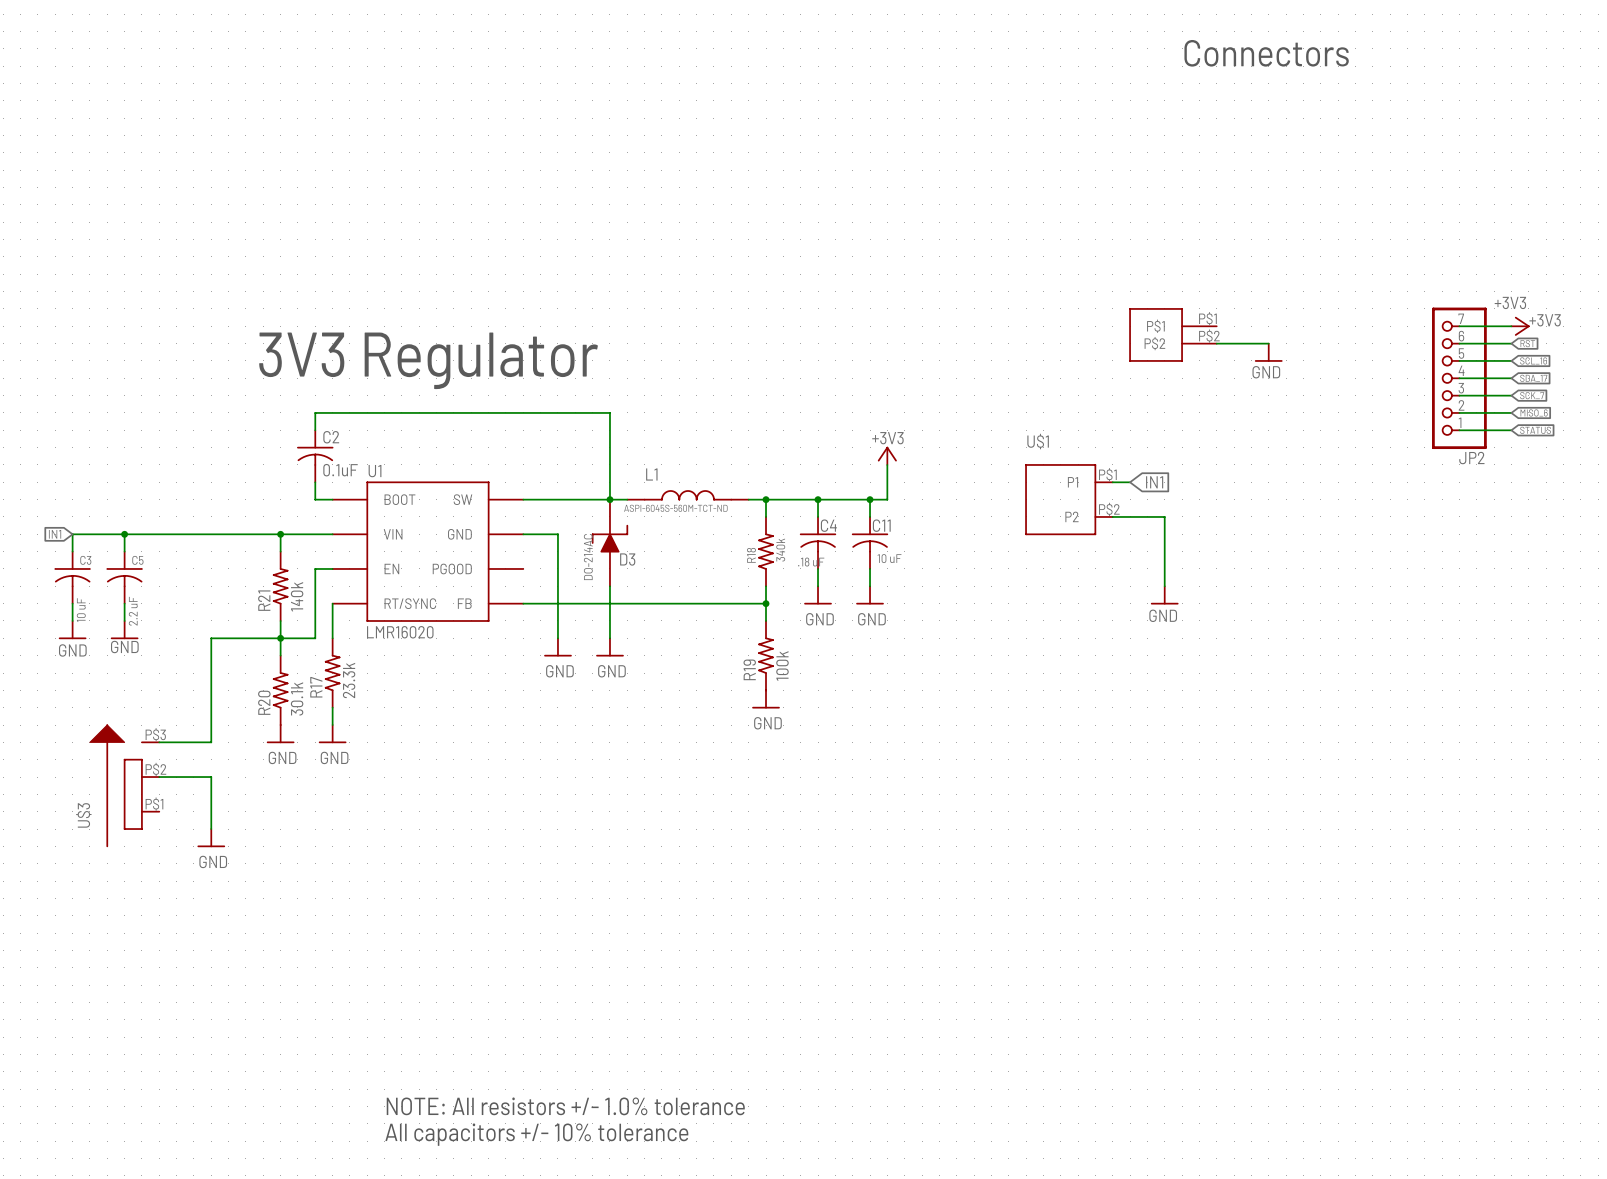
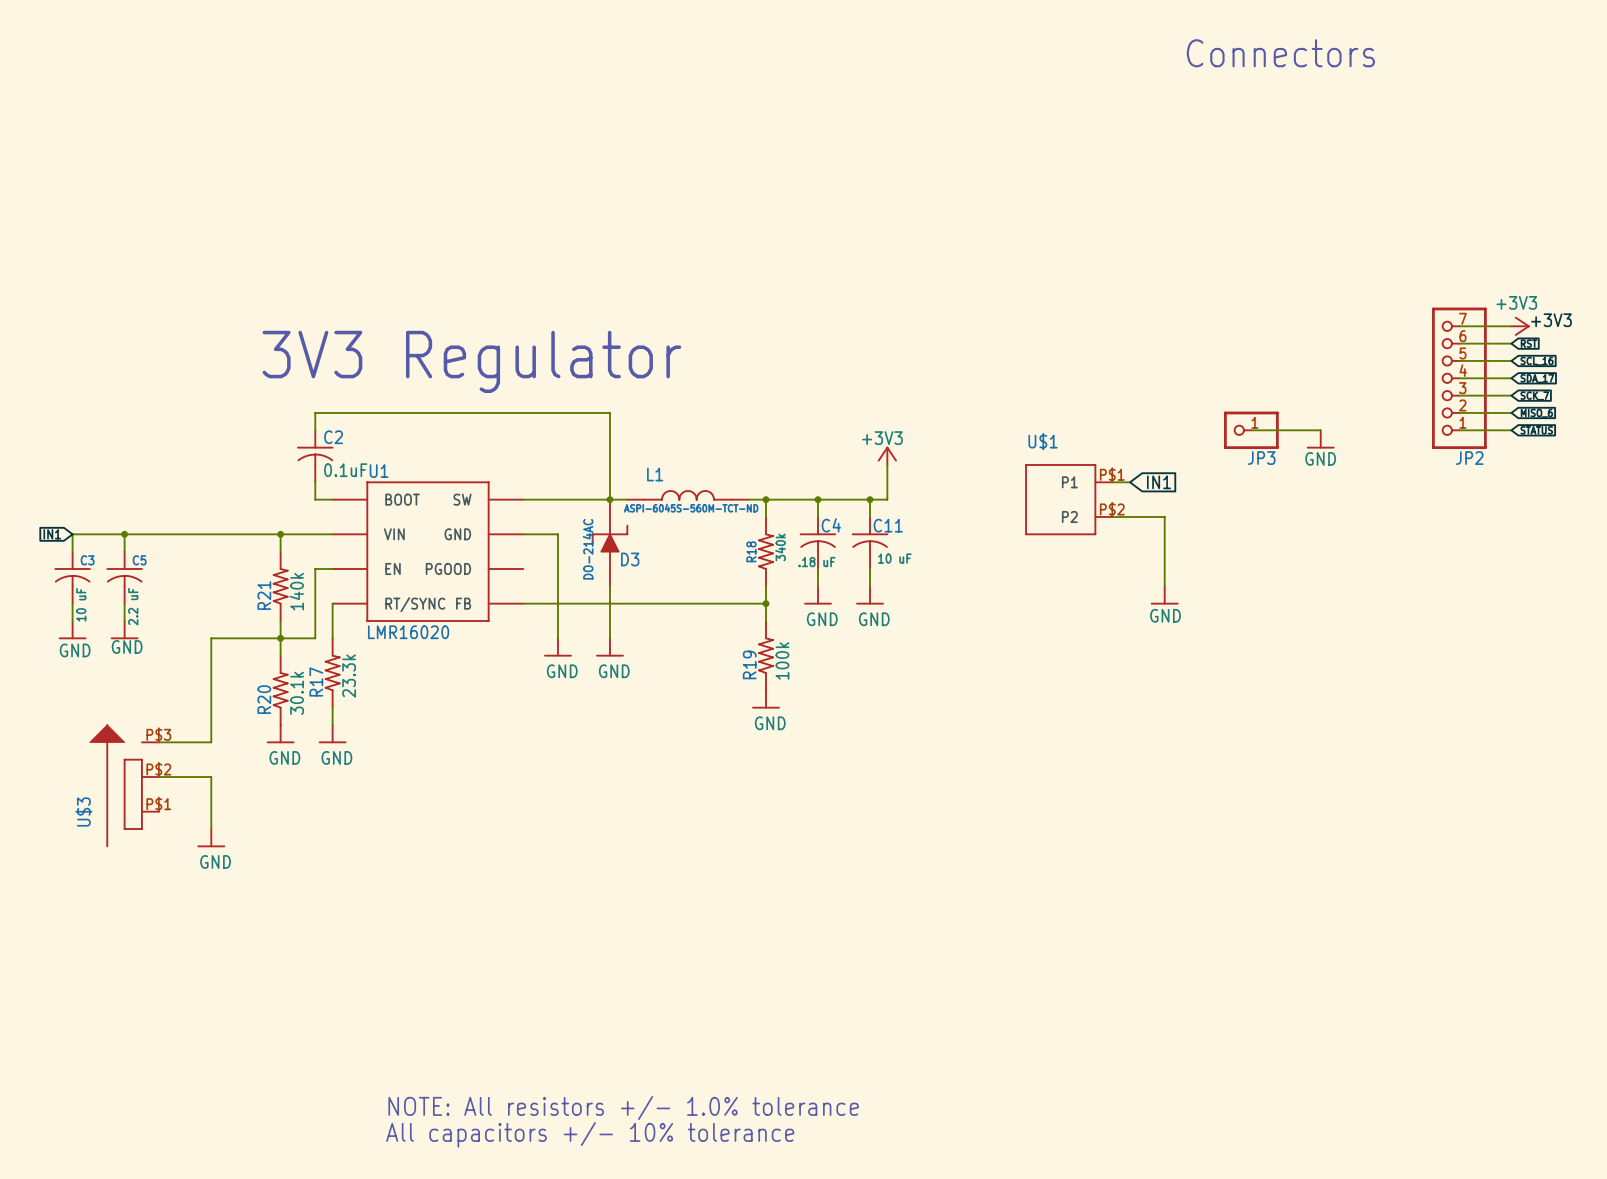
part: (1172, 334) -> none
wire: (1216, 343) (1268, 343) -> none
power symbol position: GND (1268, 352) -> GND (1320, 439)
wire: none -> (1251, 430) (1320, 430)
JP3: none -> (1251, 430)

